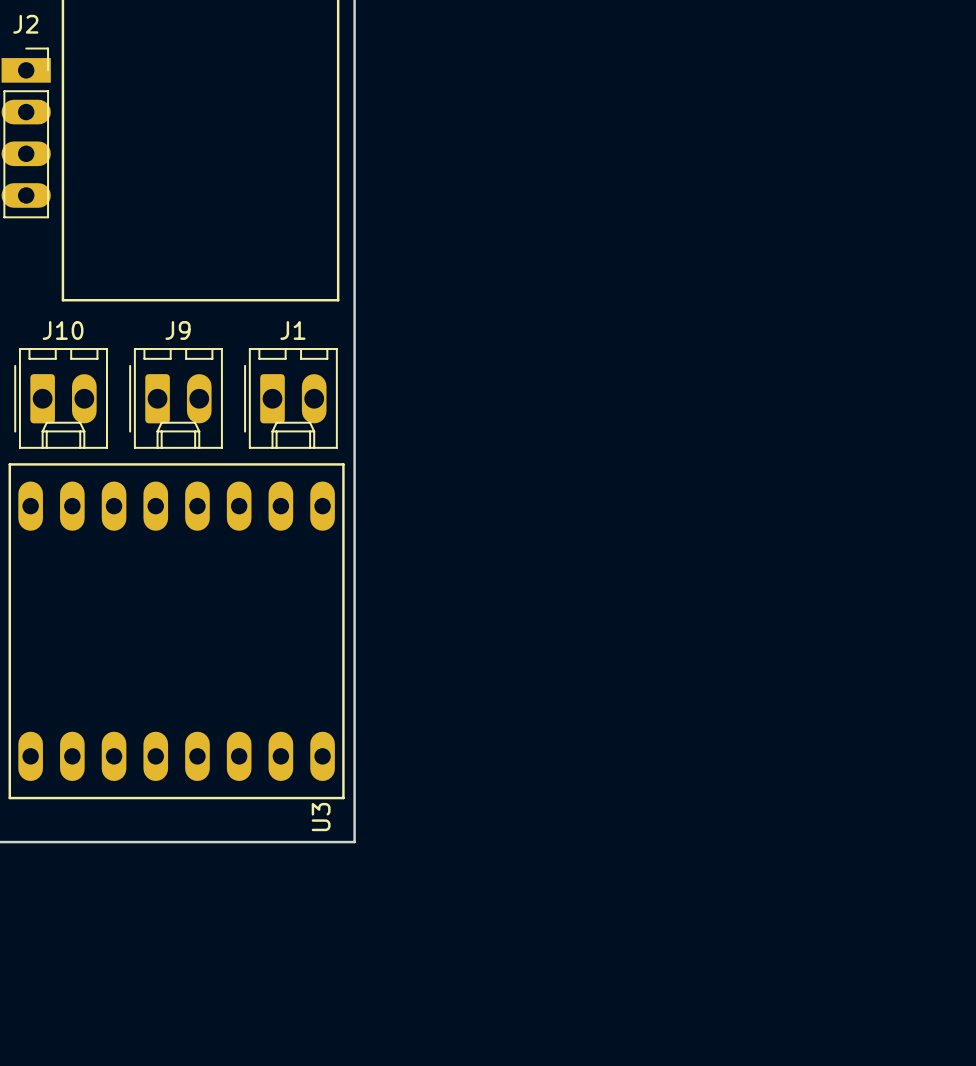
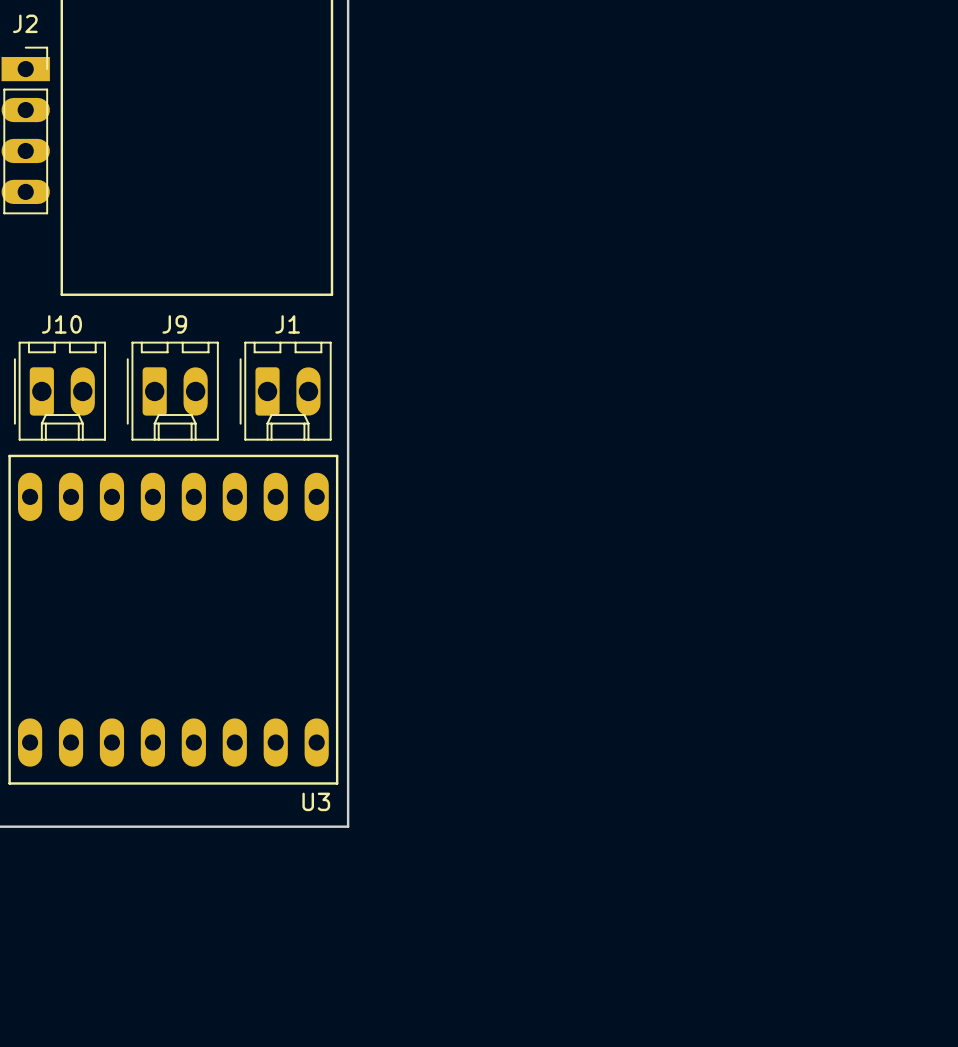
U3 name rotation: 0° (321, 817) -> 90° clockwise (316, 801)

